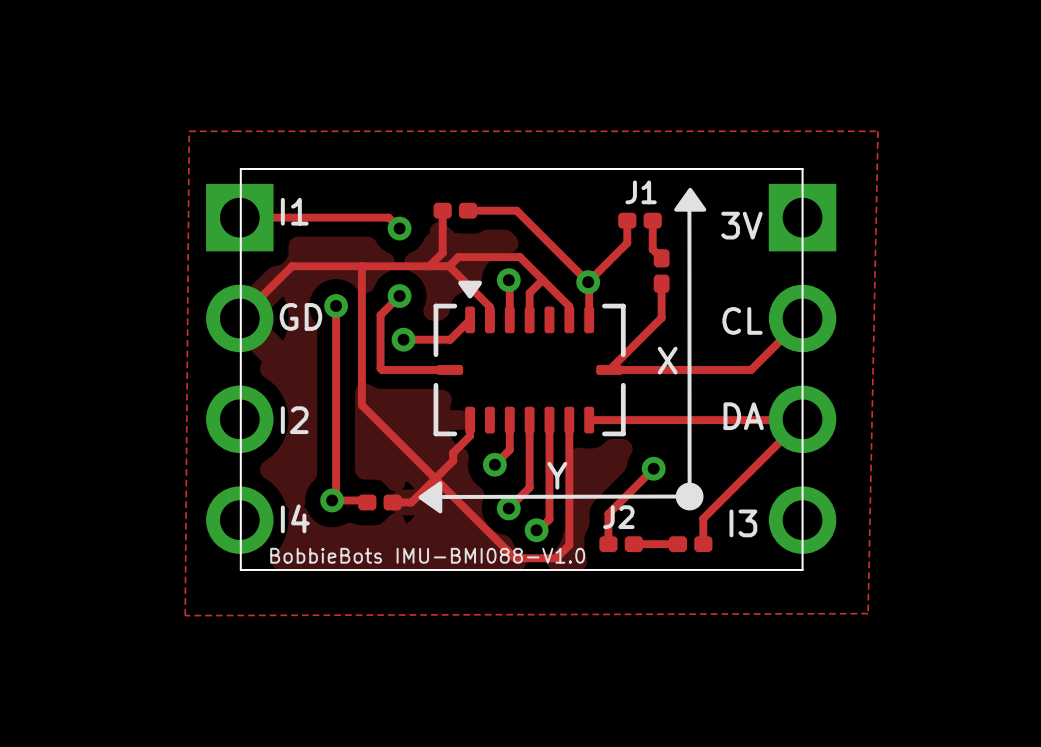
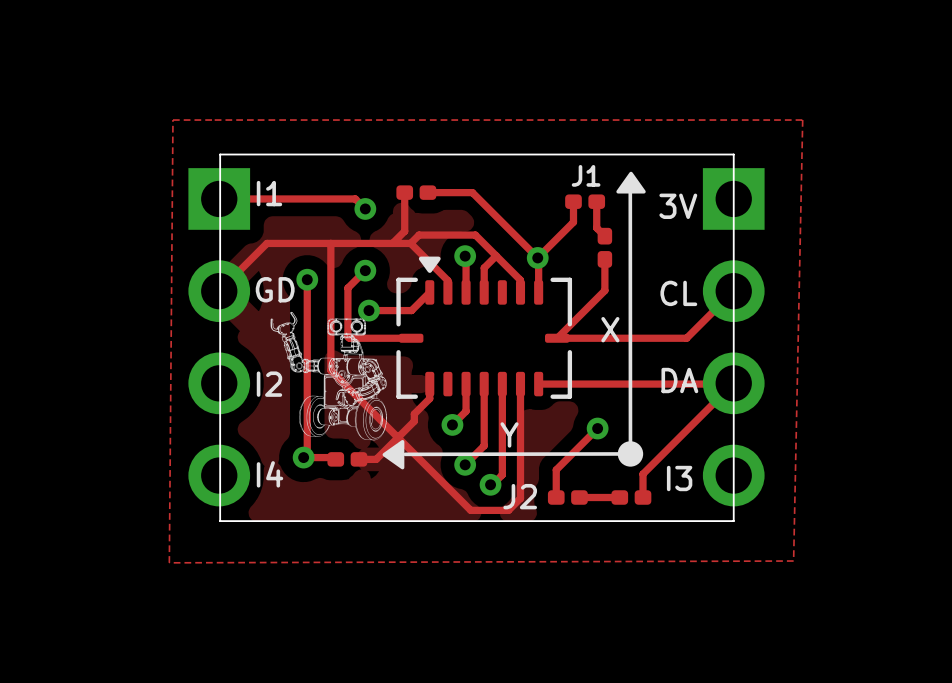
drawing: none -> [270, 311, 387, 441]
text position: J2 (618, 517) -> J2 (520, 496)
text: BobbieBots IMU-BMI088-V1.0 (427, 555) -> none

